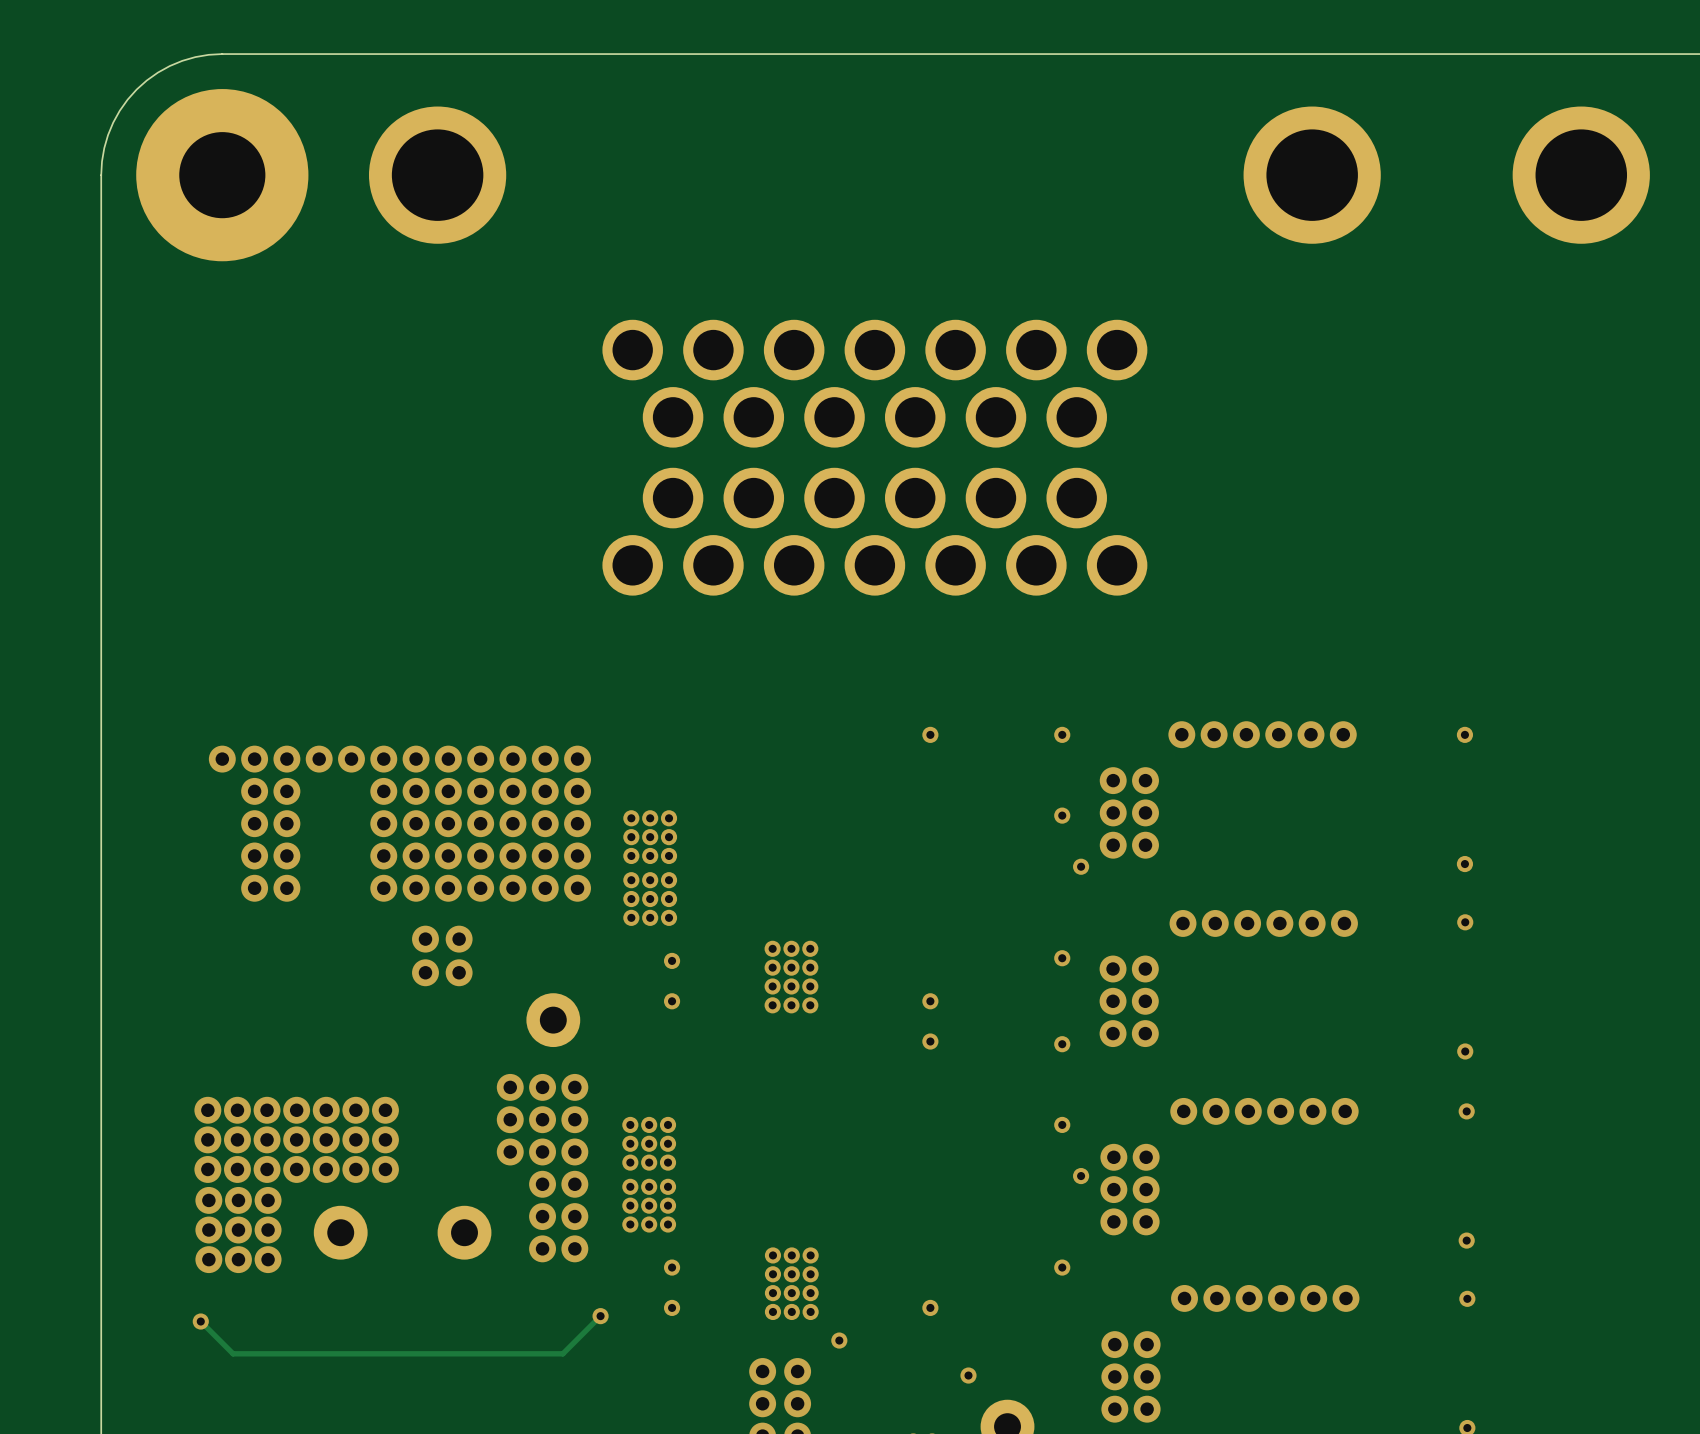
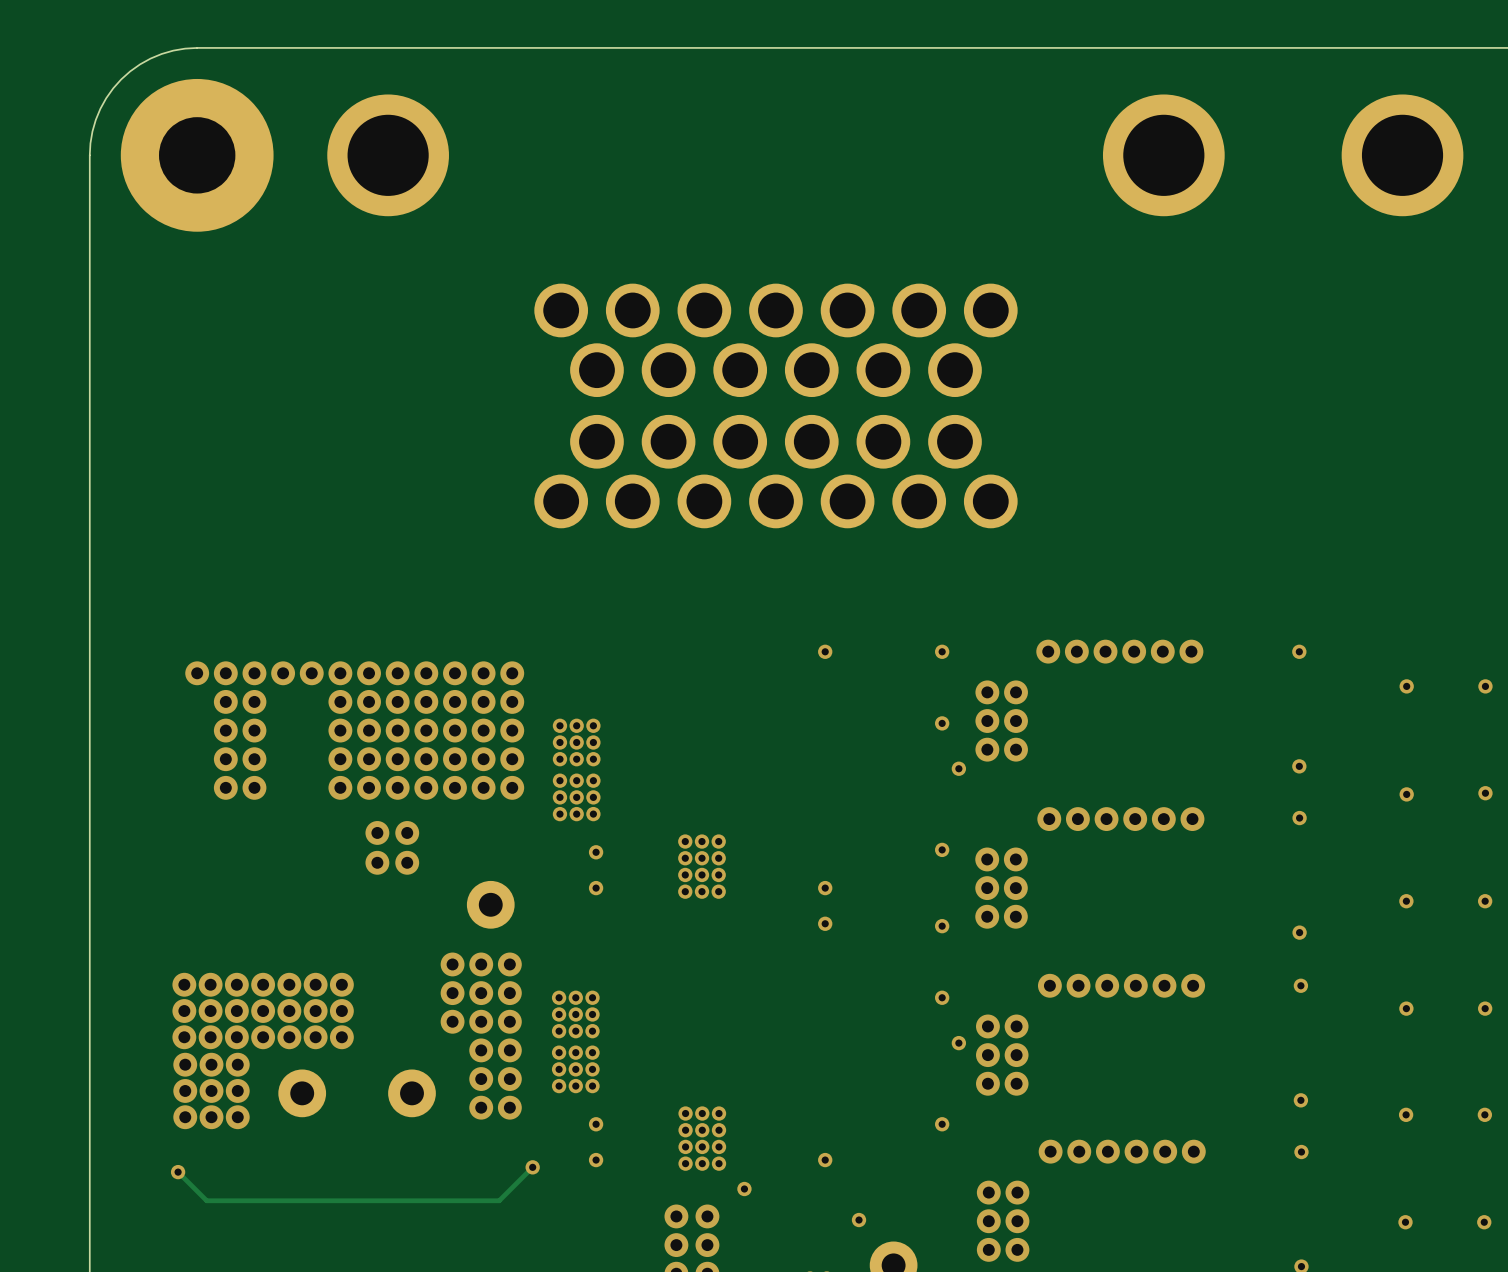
via: none -> (1406, 686)
via: none -> (1485, 686)
via: none -> (1485, 793)
via: none -> (1406, 794)
via: none -> (1406, 901)
via: none -> (1485, 901)
via: none -> (1406, 1008)
via: none -> (1485, 1008)
via: none -> (1406, 1114)
via: none -> (1484, 1114)
via: none -> (1405, 1222)
via: none -> (1484, 1222)

